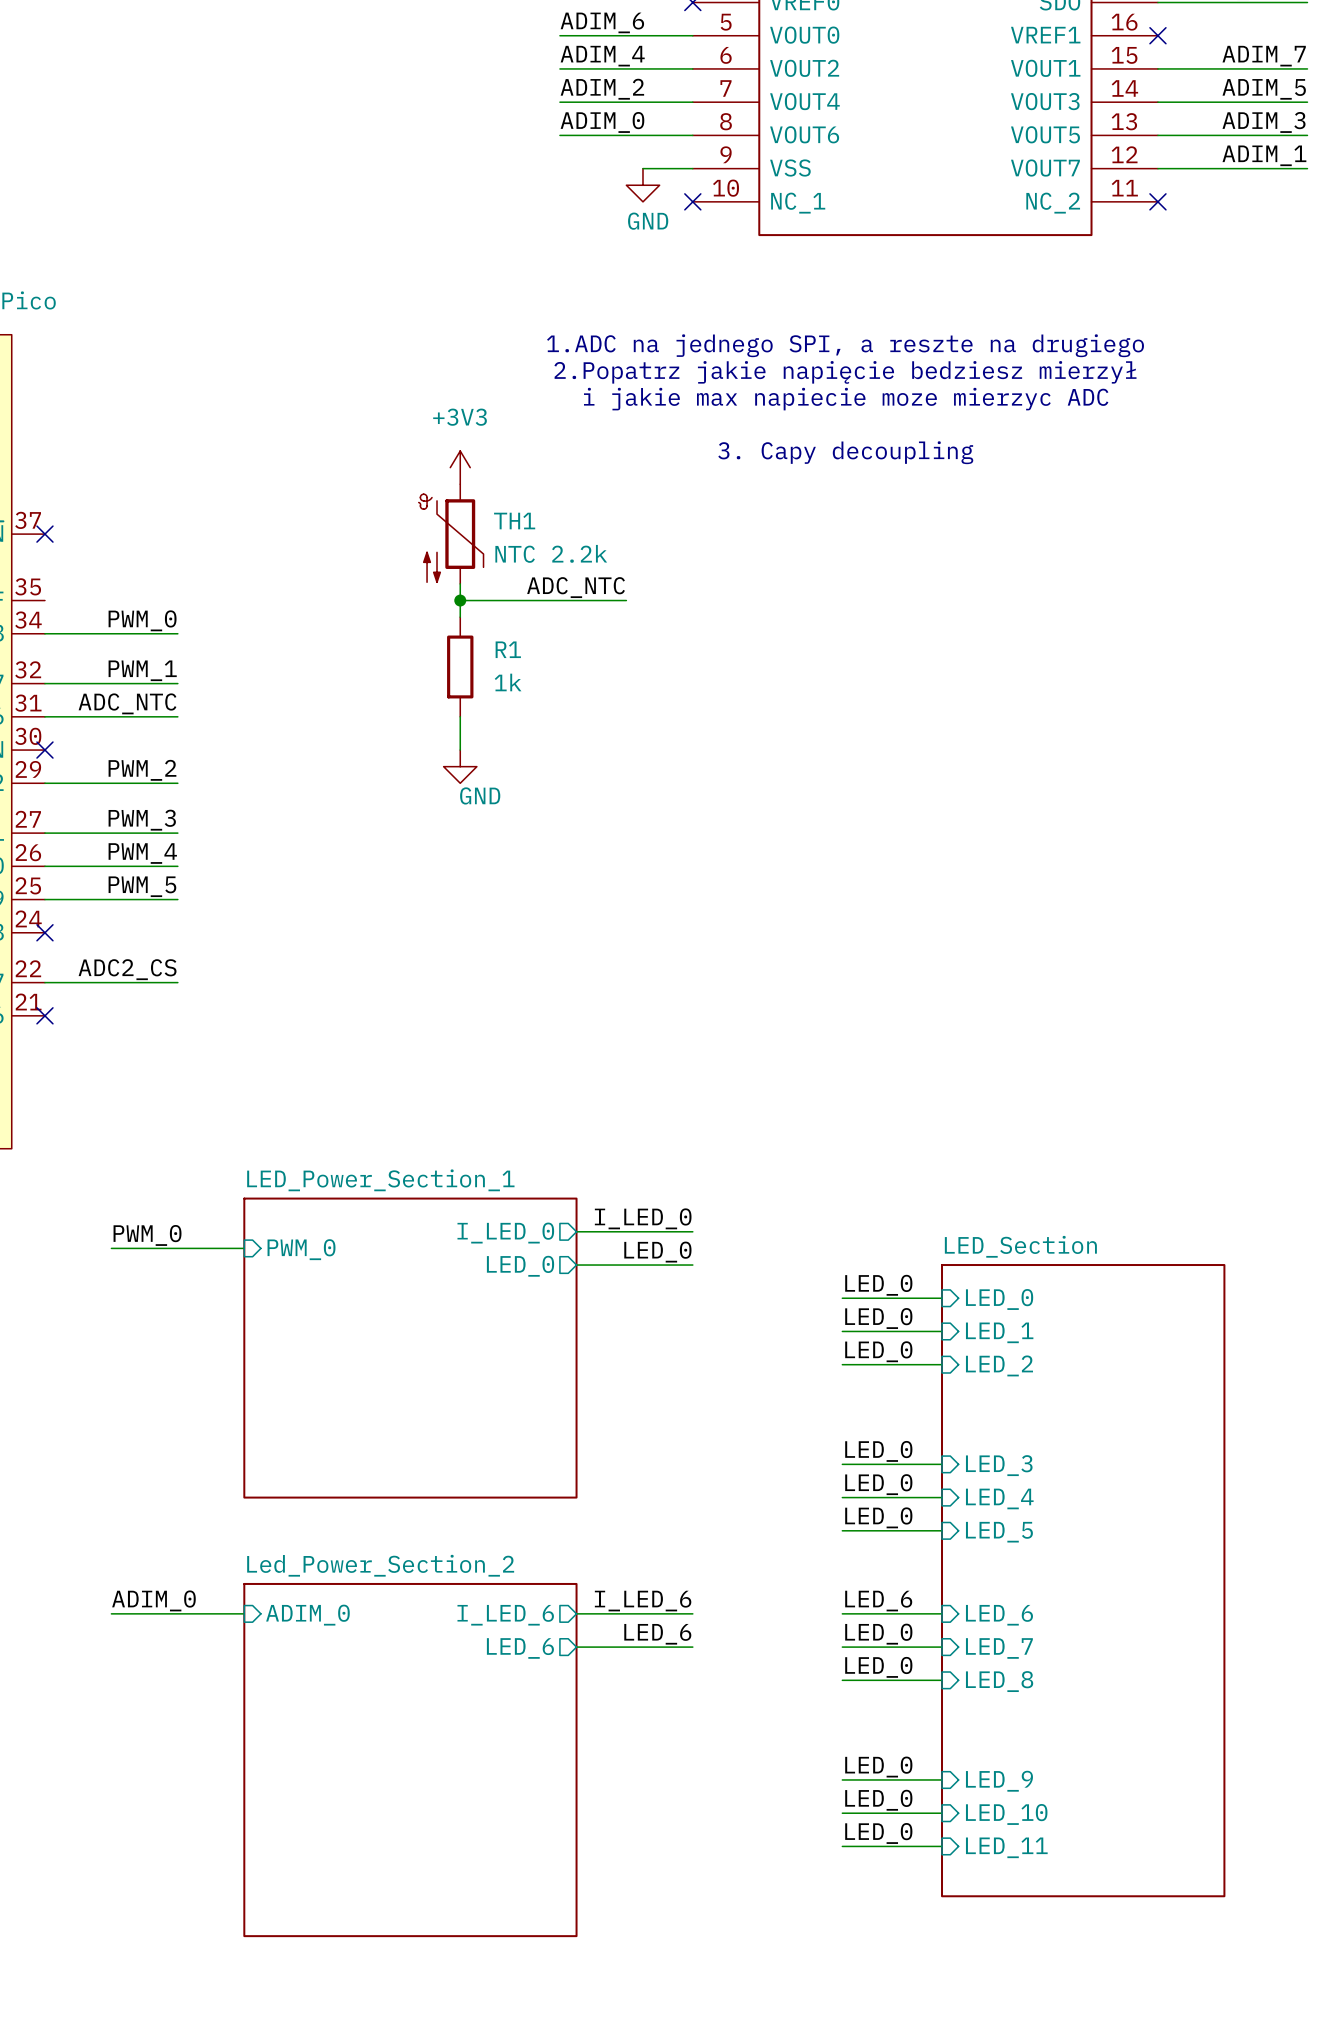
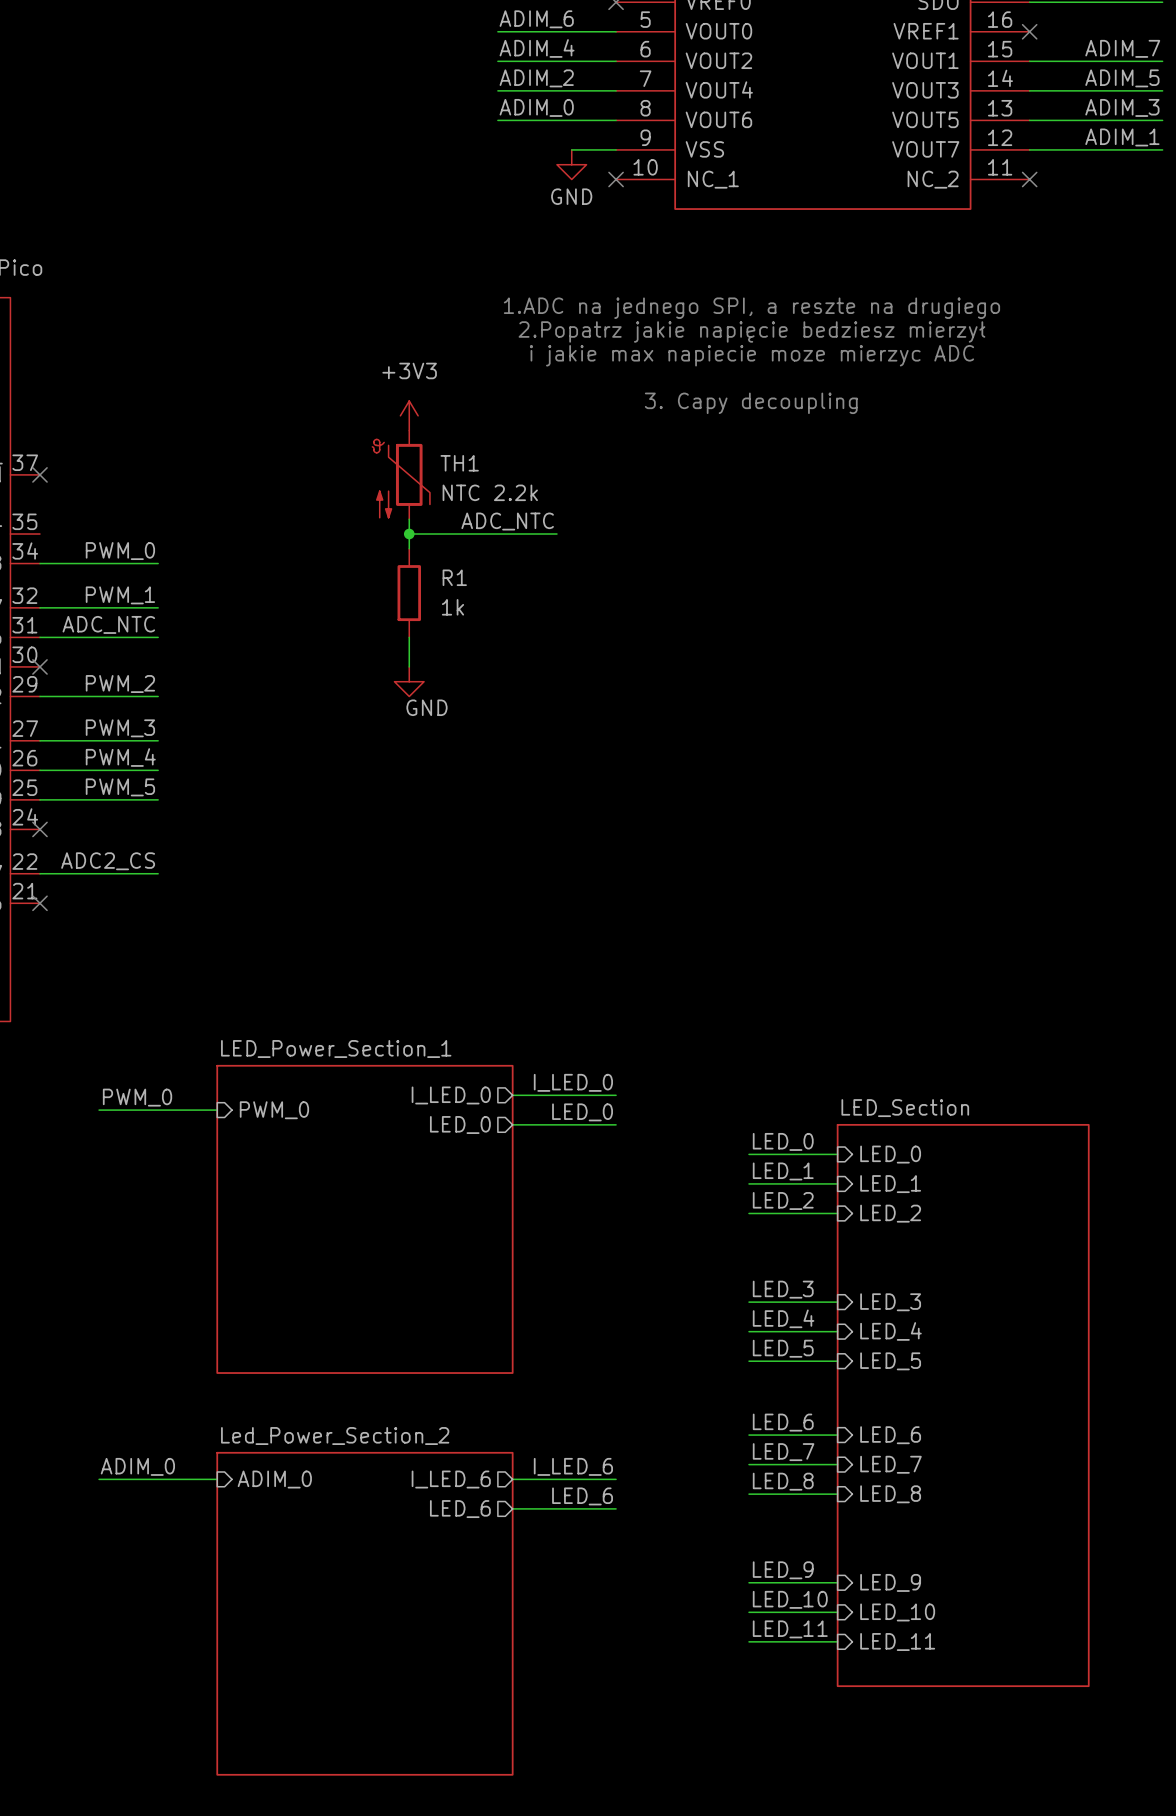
sheet LED_Power_Section_1 shape: [243, 1197, 578, 1499] -> [216, 1064, 514, 1374]
label: LED_0 (878, 1318) -> LED_1 (783, 1171)
label: LED_0 (878, 1351) -> LED_2 (783, 1201)
label: LED_0 (878, 1451) -> LED_3 (783, 1289)
label: LED_0 (878, 1484) -> LED_4 (783, 1318)
label: LED_0 (878, 1517) -> LED_5 (783, 1348)
sheet Led_Power_Section_2 shape: [243, 1582, 578, 1938] -> [216, 1451, 514, 1776]
label position: ADIM_0 (153, 1600) -> ADIM_0 (137, 1466)
label position: I_LED_6 (643, 1601) -> I_LED_6 (573, 1466)
wire: (111, 1613) (244, 1613) -> (99, 1479) (217, 1479)
wire: (576, 1613) (692, 1613) -> (512, 1479) (616, 1479)
sheet pin position: ADIM_0 (307, 1615) -> ADIM_0 (274, 1479)
sheet pin position: I_LED_6 (505, 1615) -> I_LED_6 (451, 1479)
label position: LED_6 (657, 1634) -> LED_6 (582, 1496)
label: LED_0 (878, 1634) -> LED_7 (783, 1452)
wire: (576, 1647) (692, 1647) -> (512, 1508) (616, 1508)
sheet pin position: LED_6 (520, 1648) -> LED_6 (460, 1509)
label: LED_0 (878, 1667) -> LED_8 (783, 1481)
label: LED_0 (878, 1767) -> LED_9 (783, 1570)
label: LED_0 (878, 1800) -> LED_10 (790, 1599)
label: LED_0 (878, 1833) -> LED_11 (790, 1629)

